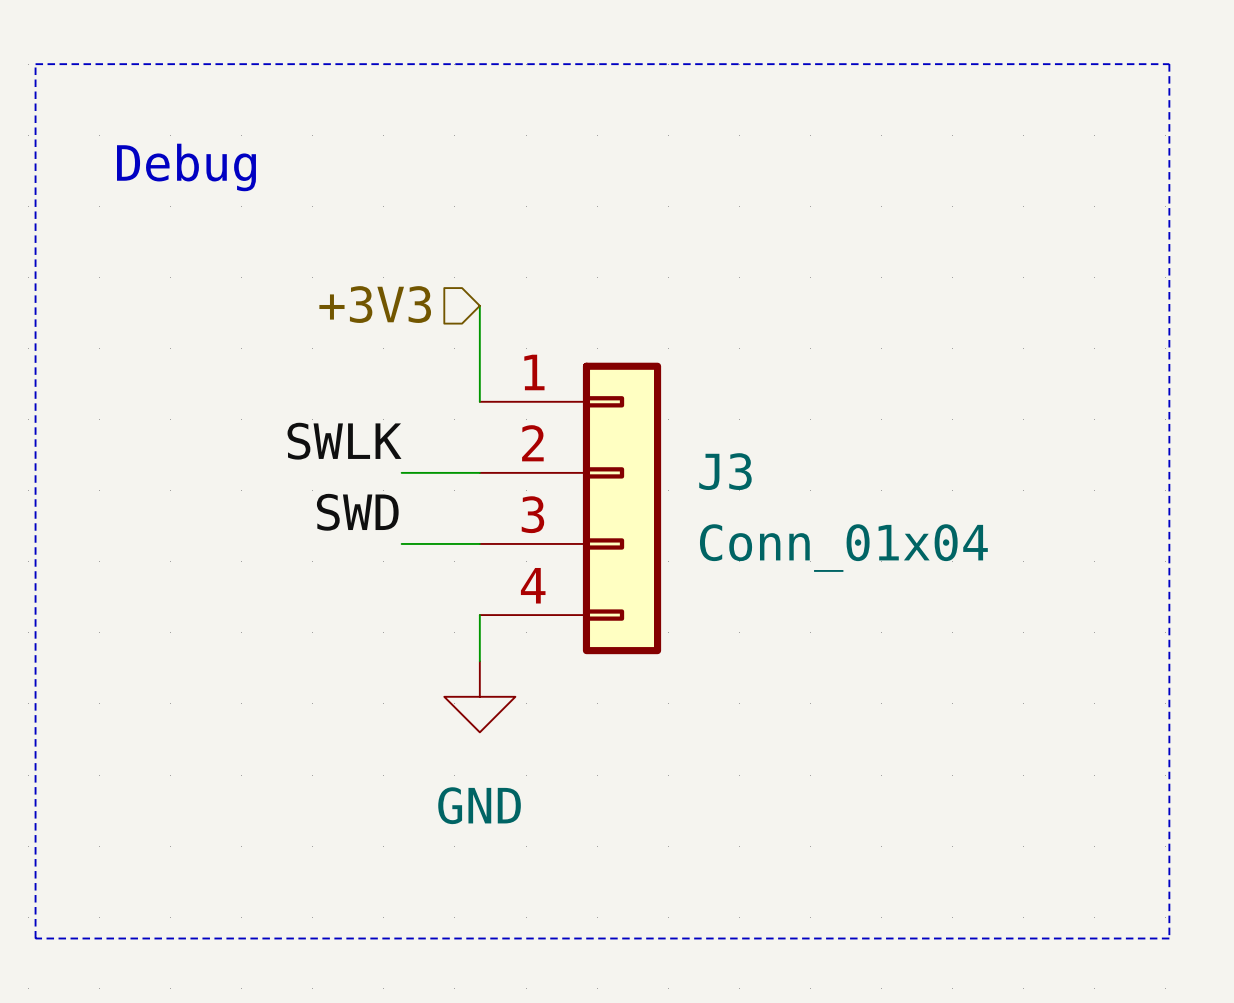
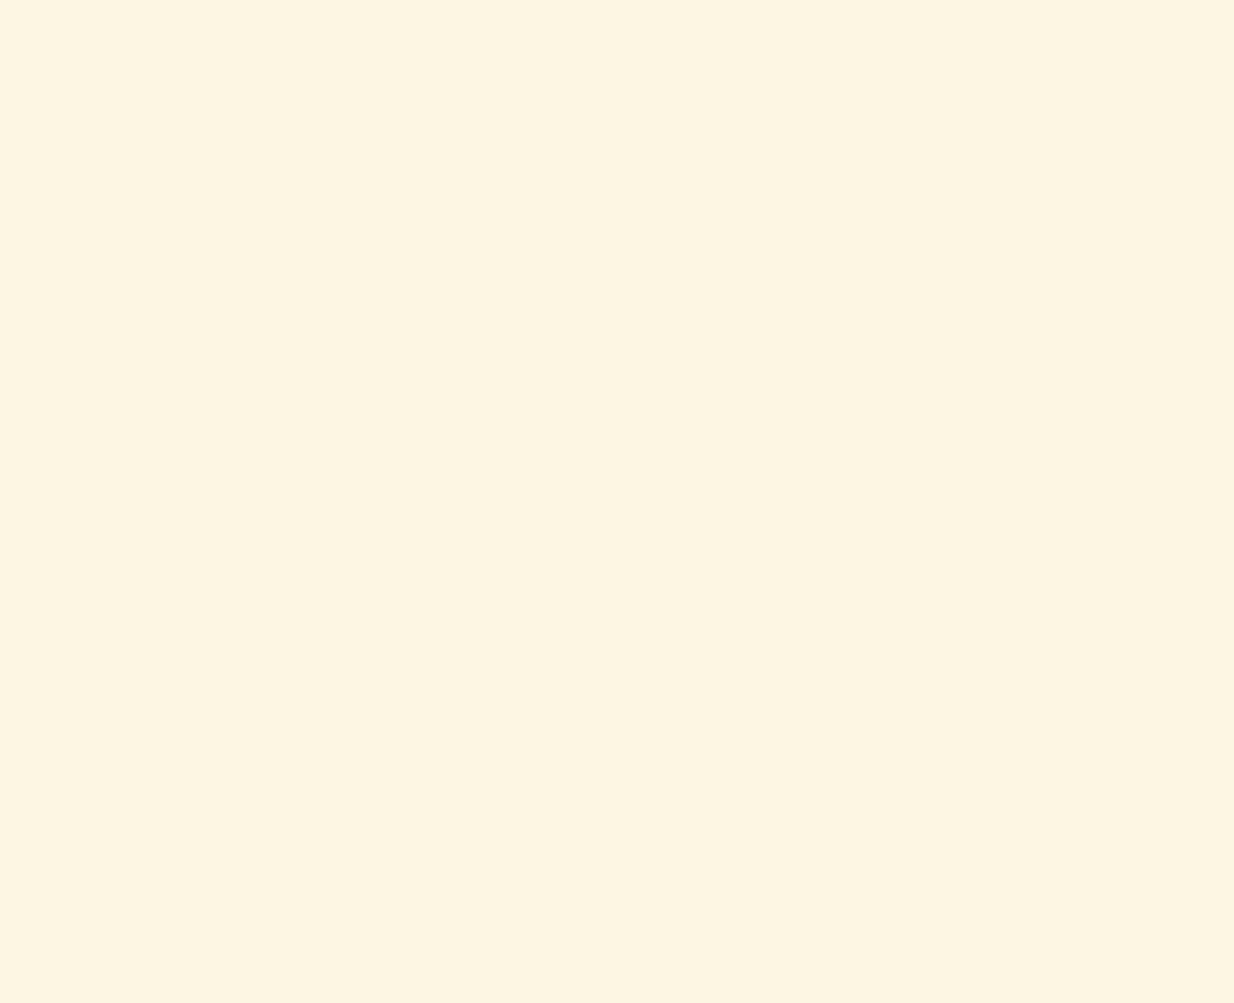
line: (35, 64) (1169, 64) (1169, 938) (35, 938) (35, 64) -> none
text: Debug (186, 167) -> none
hierarchical label: +3V3 (375, 304) -> none
wire: (479, 305) (479, 401) -> none
label: SWLK (344, 441) -> none
wire: (401, 472) (479, 472) -> none
J3: Conn_01x04 (570, 508) -> none
label: SWD (357, 512) -> none
wire: (401, 543) (479, 543) -> none
wire: (479, 615) (479, 661) -> none
power symbol: GND (479, 696) -> none

